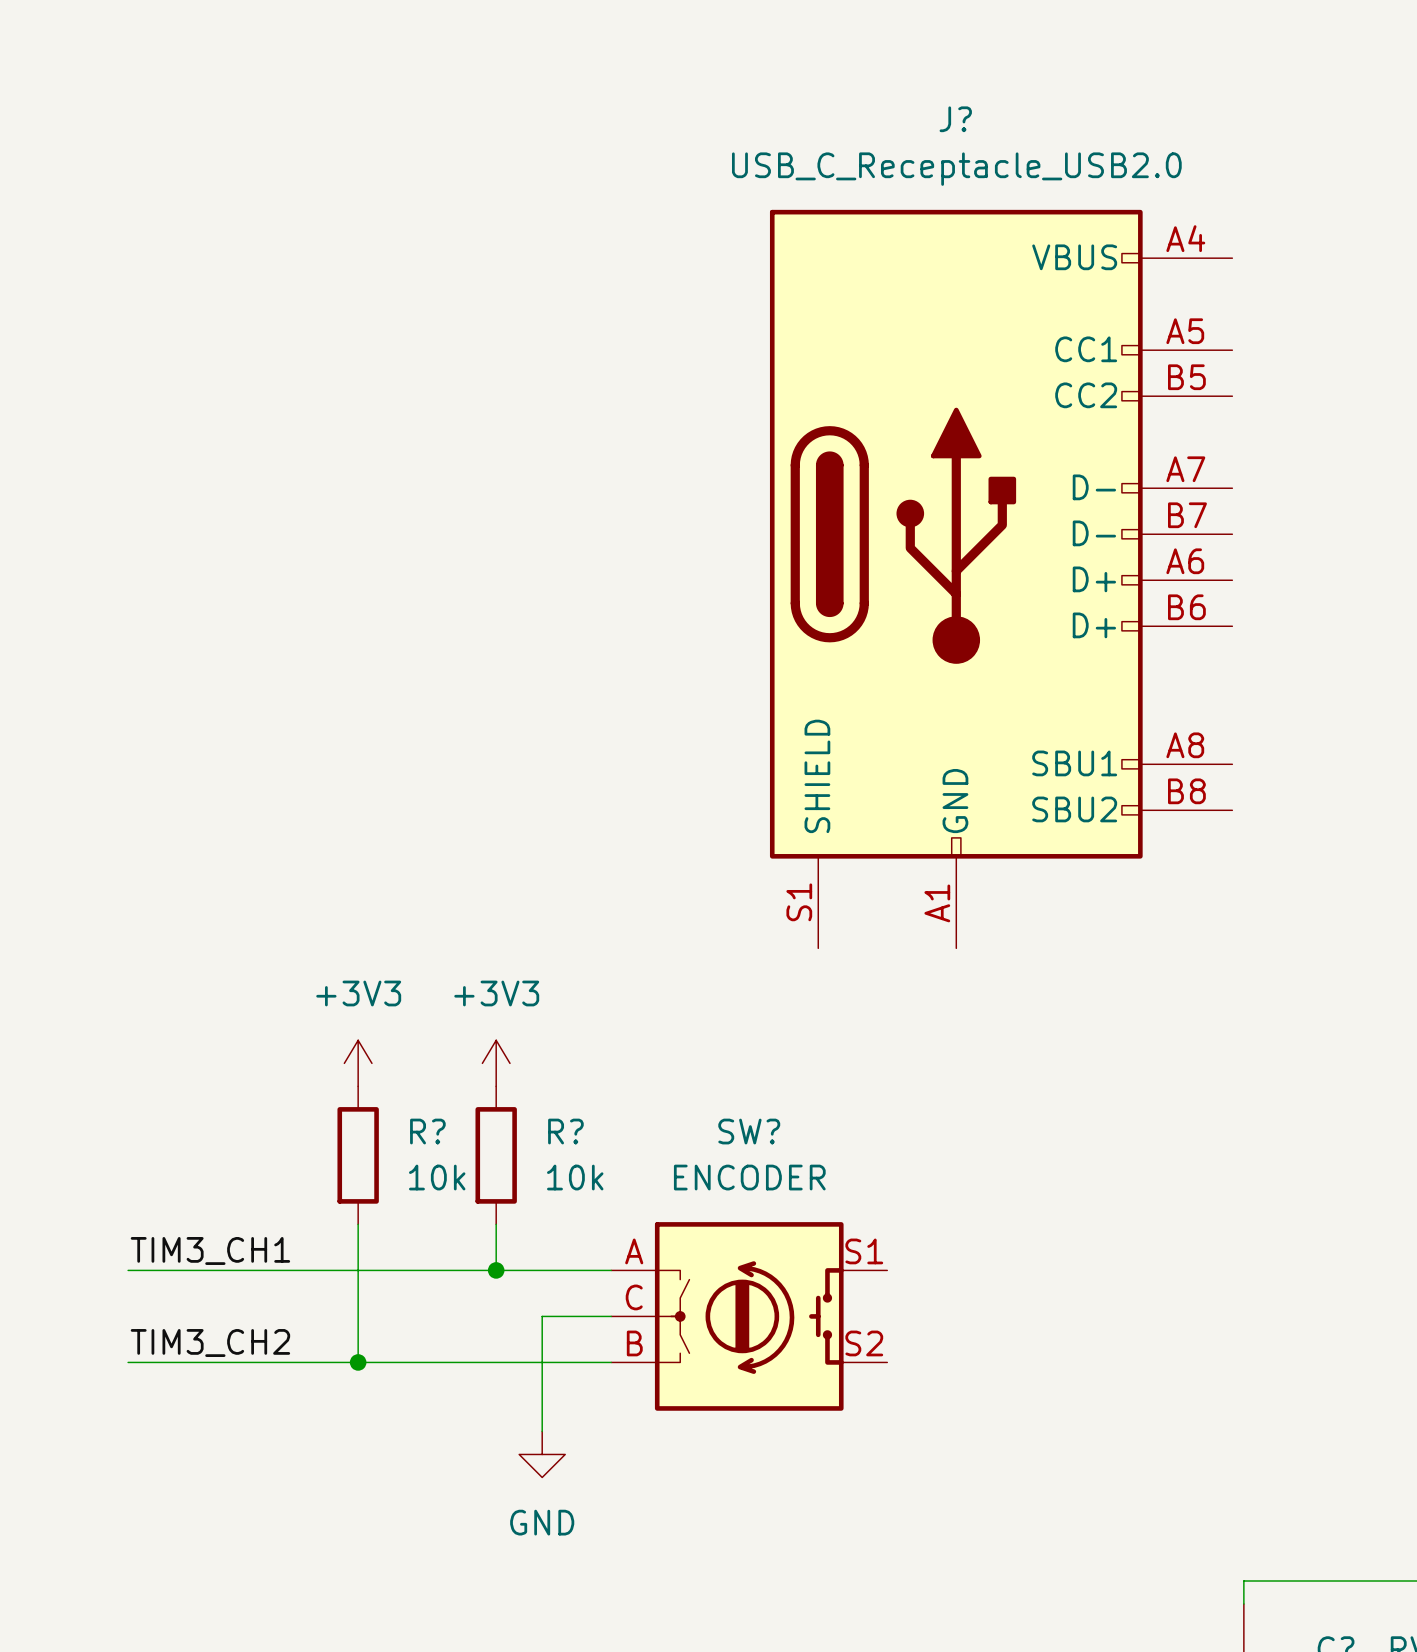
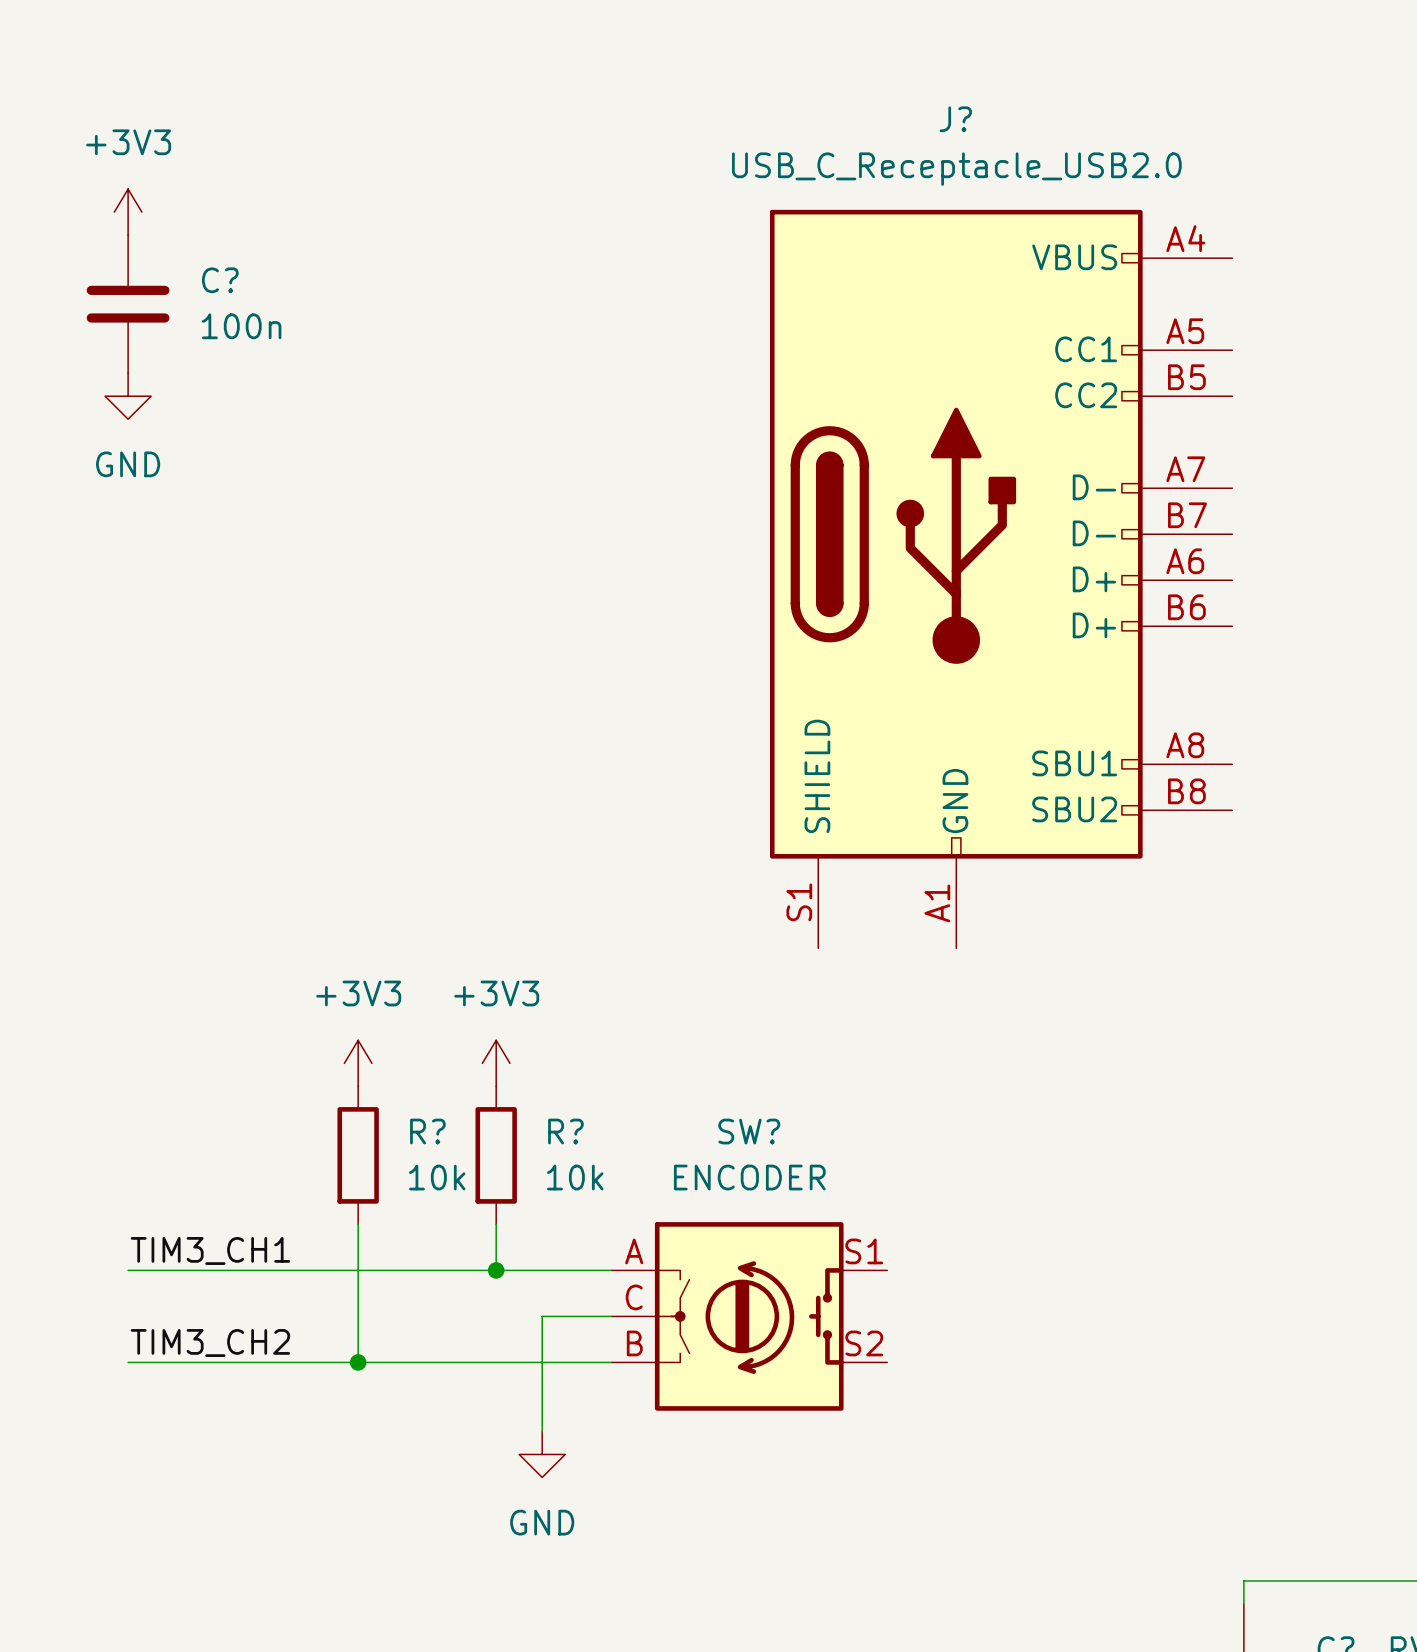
power symbol: none -> +3V3 (128, 212)
C?: none -> 100n (128, 304)
power symbol: none -> GND (128, 396)

